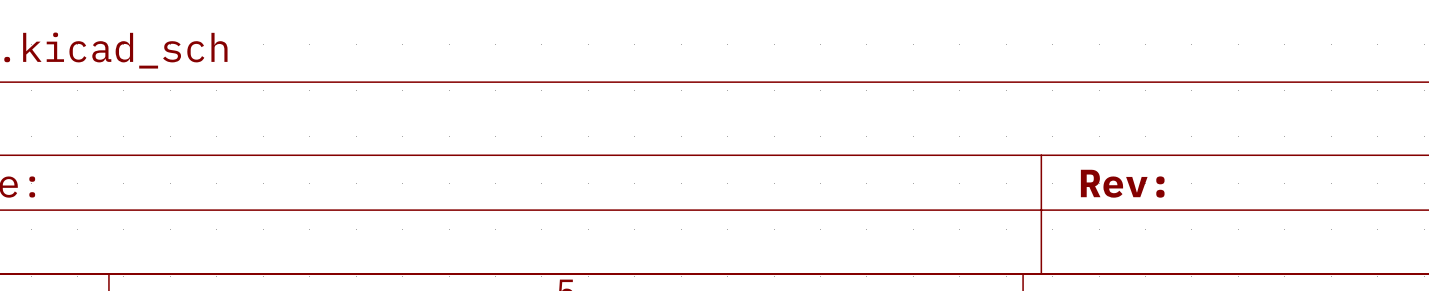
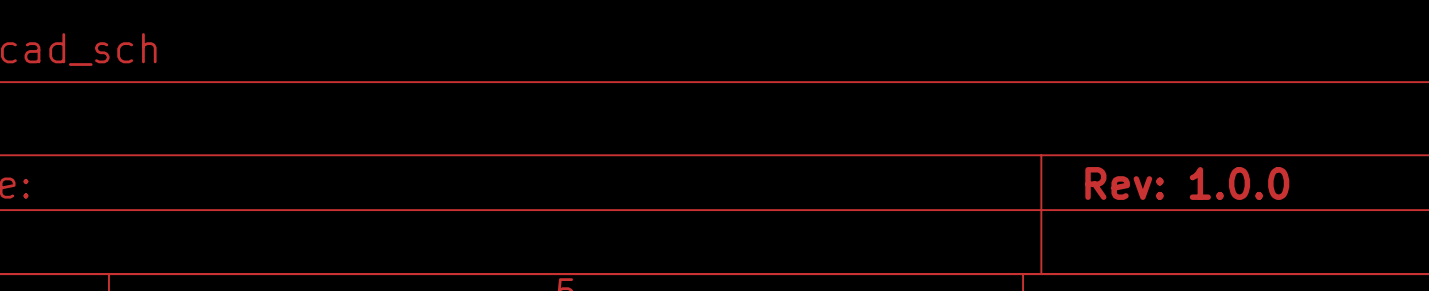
title block: Rev: (1122, 183) -> Rev: 1.0.0 (1187, 183)

